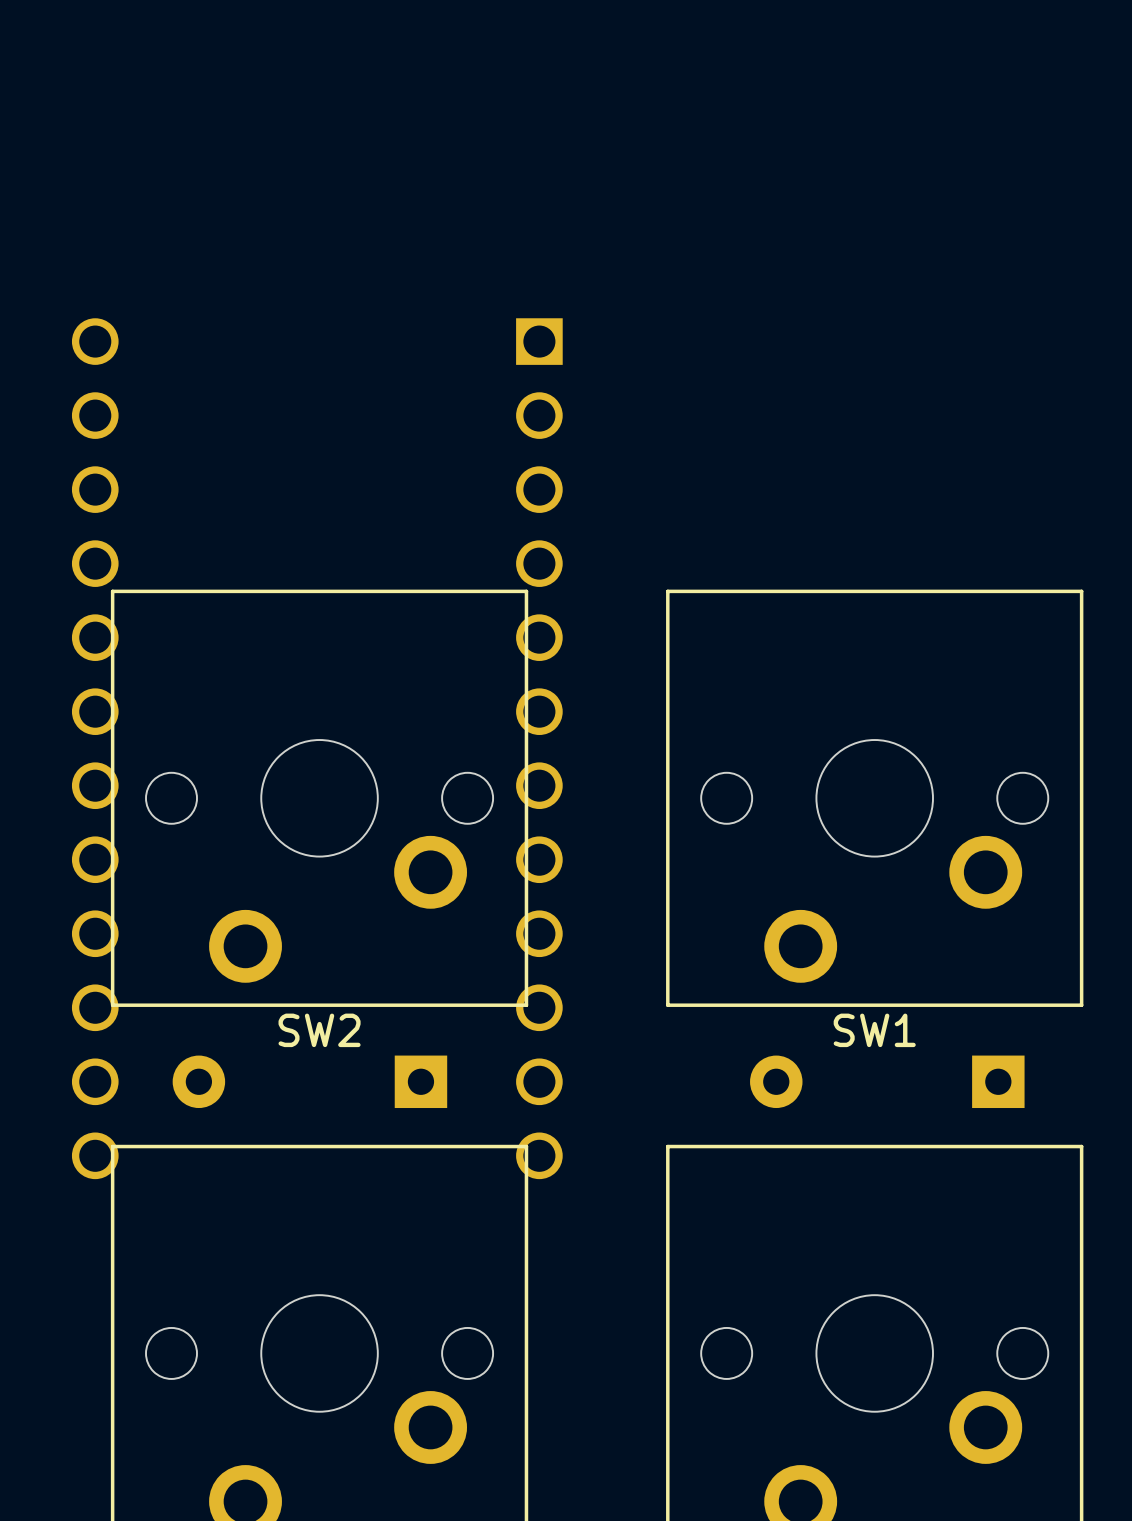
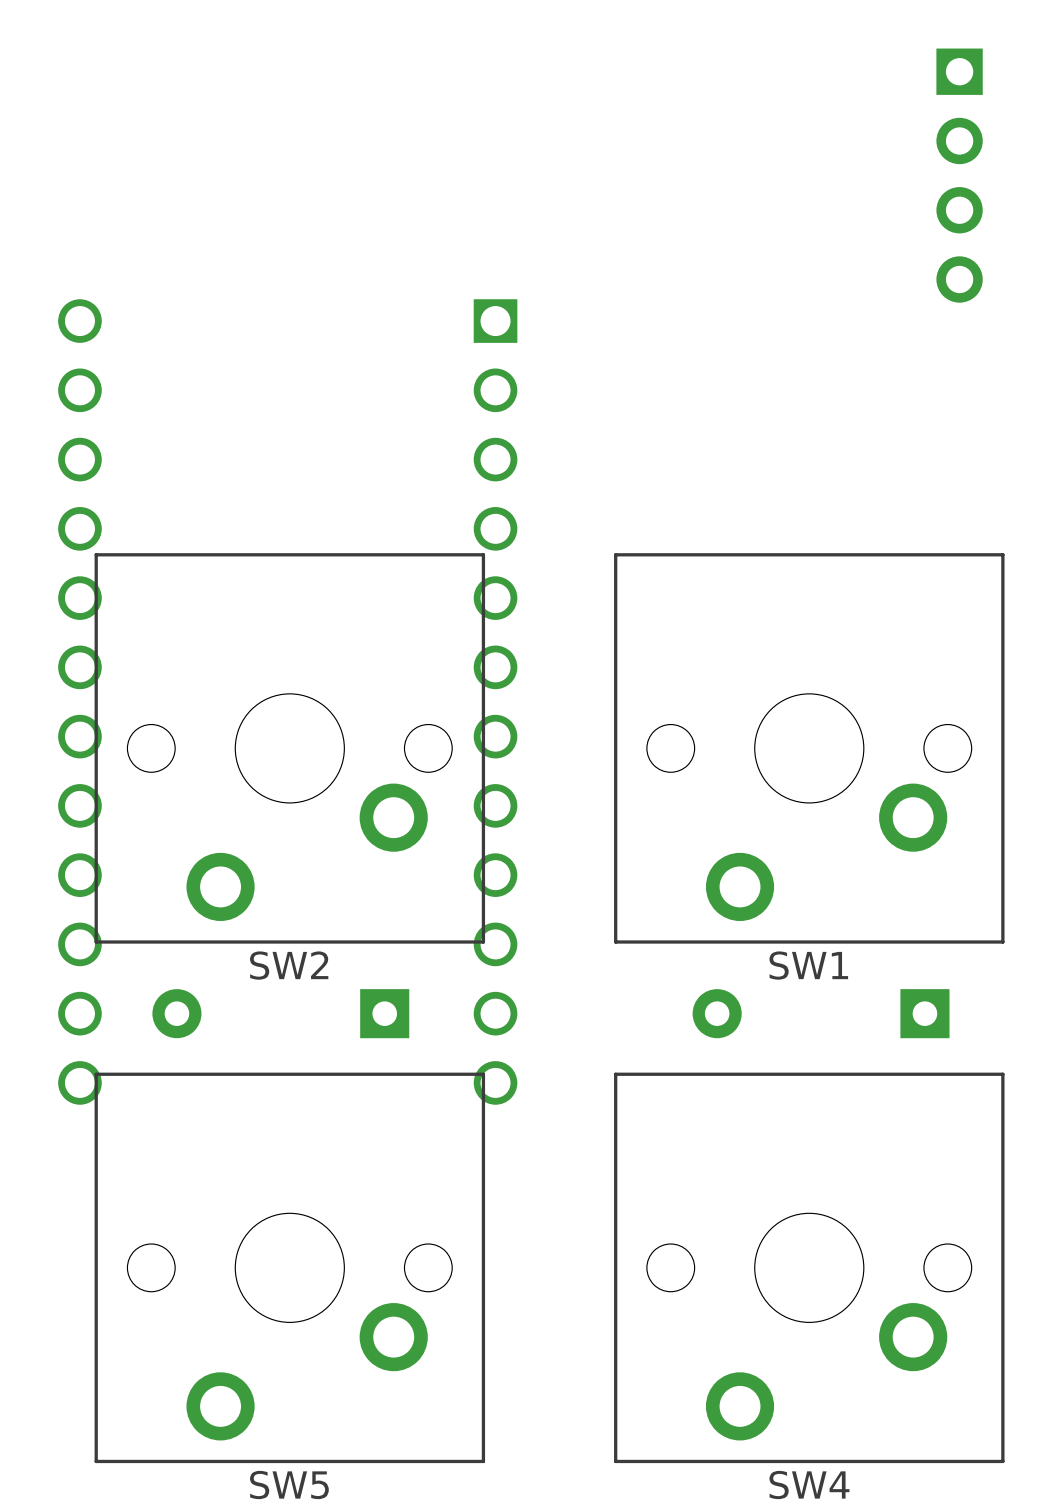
part: none -> (959, 175)

